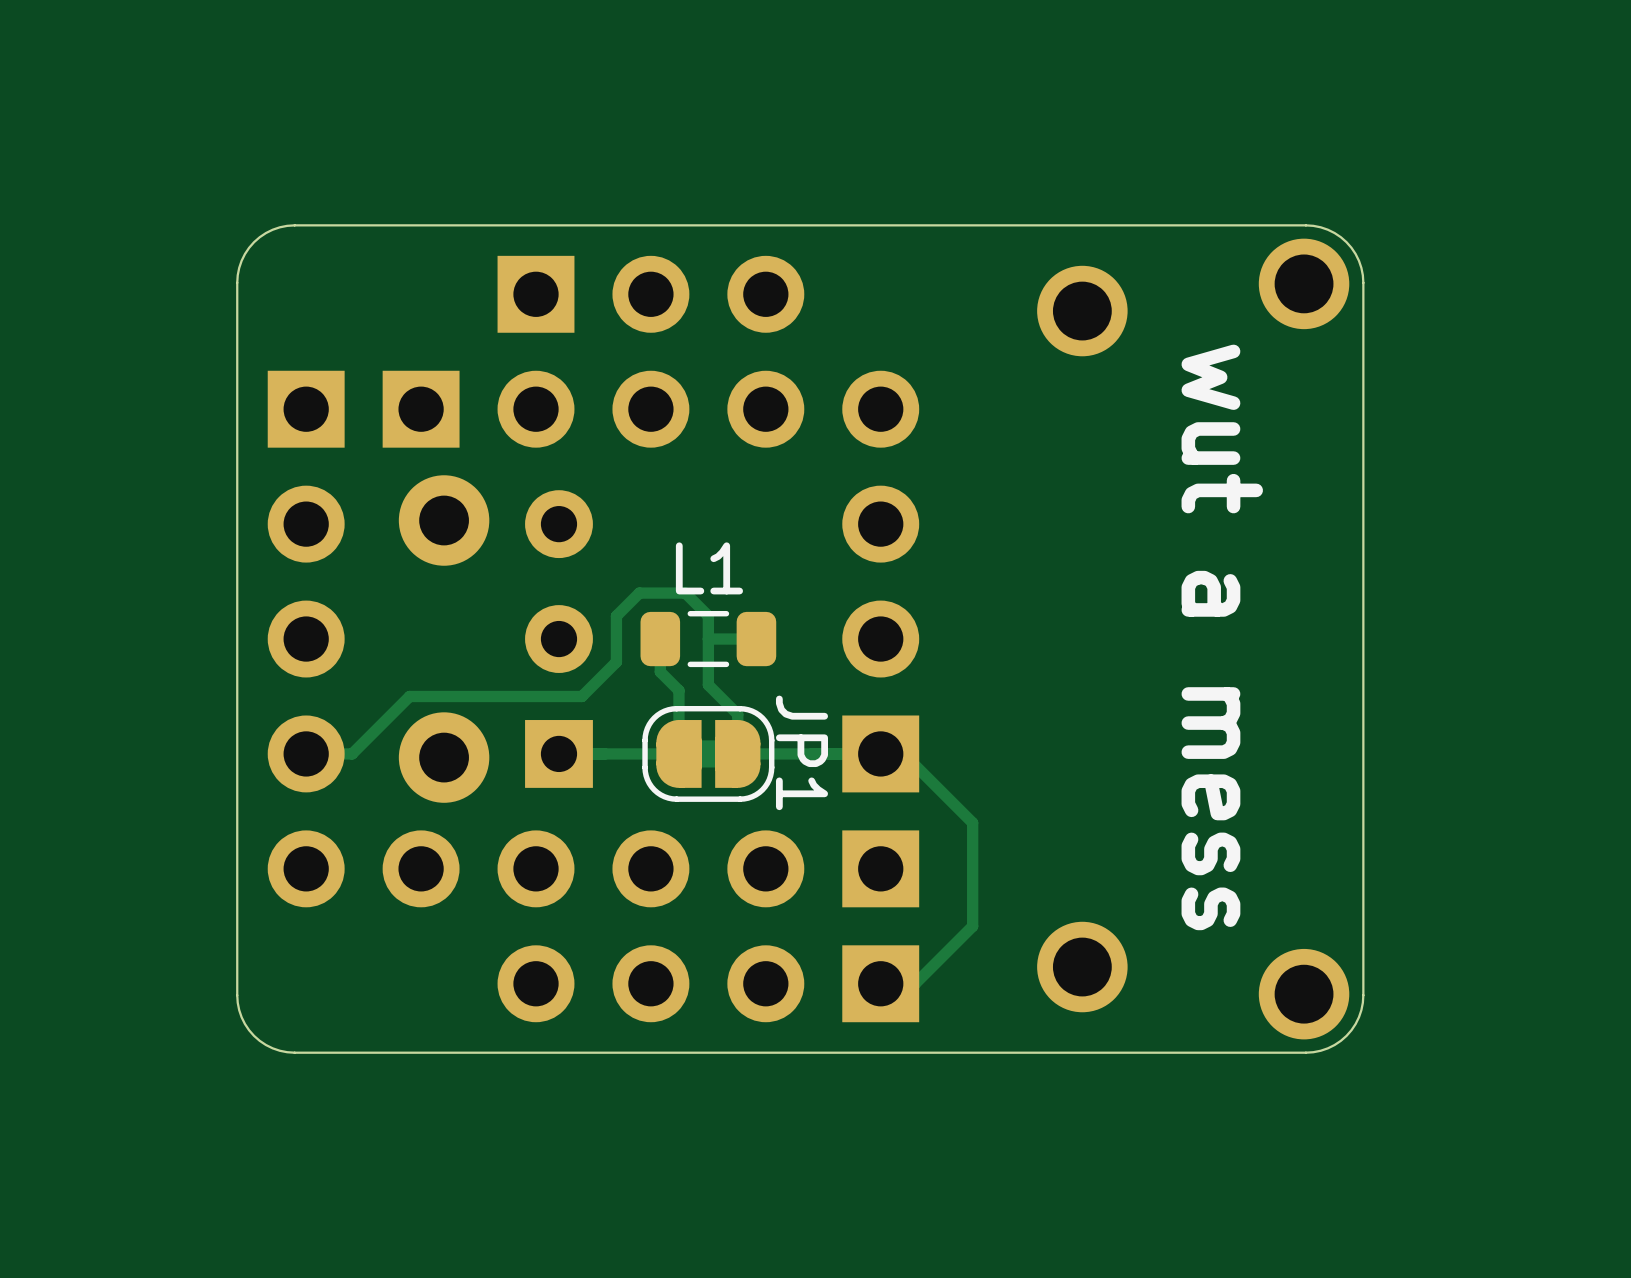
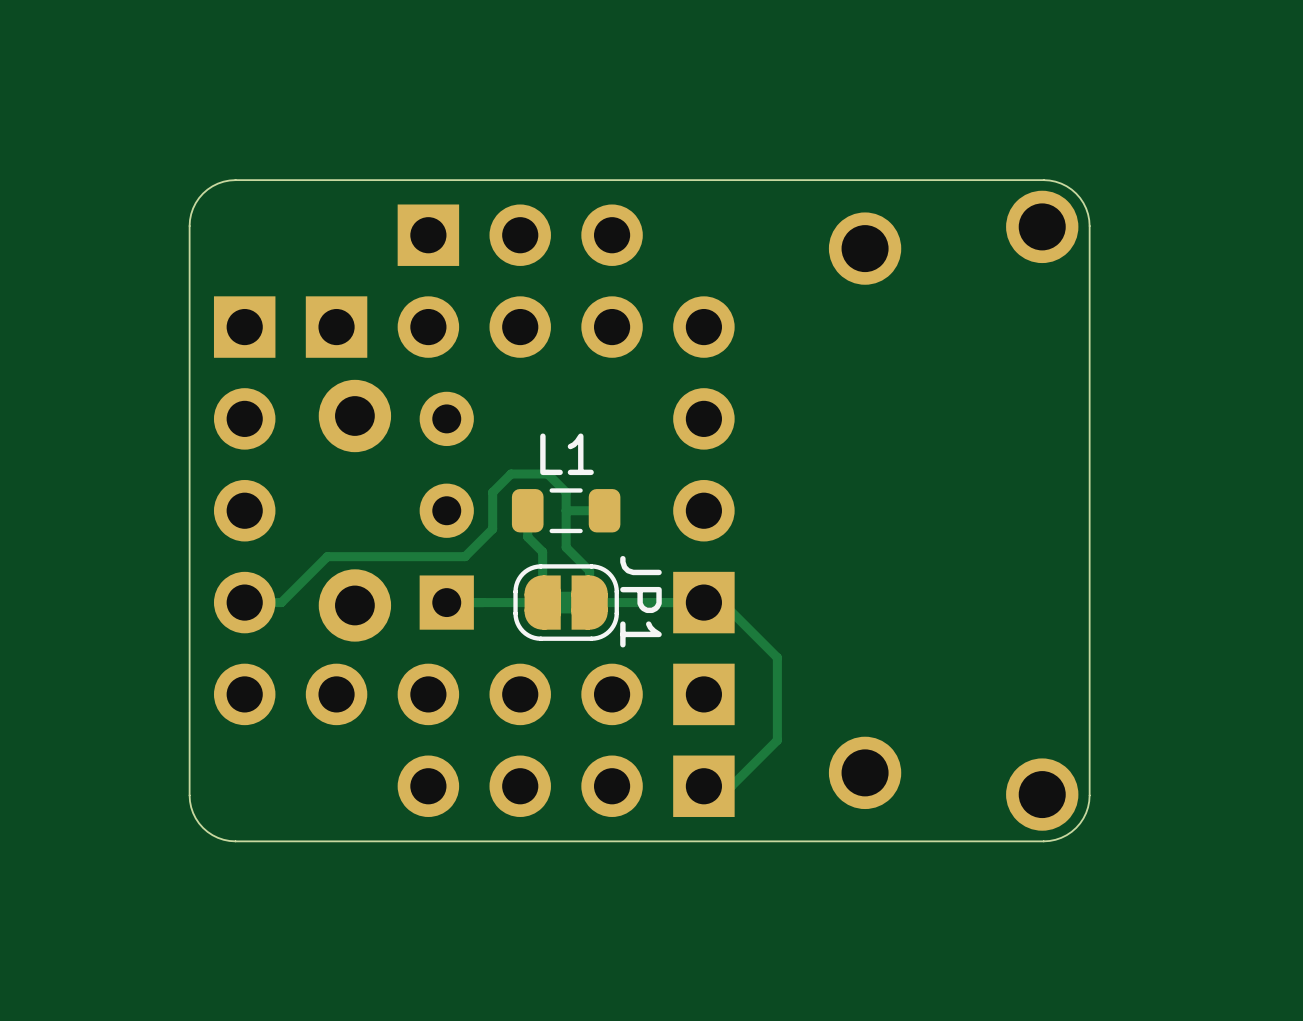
text: wut a mess (1222, 637) -> none

